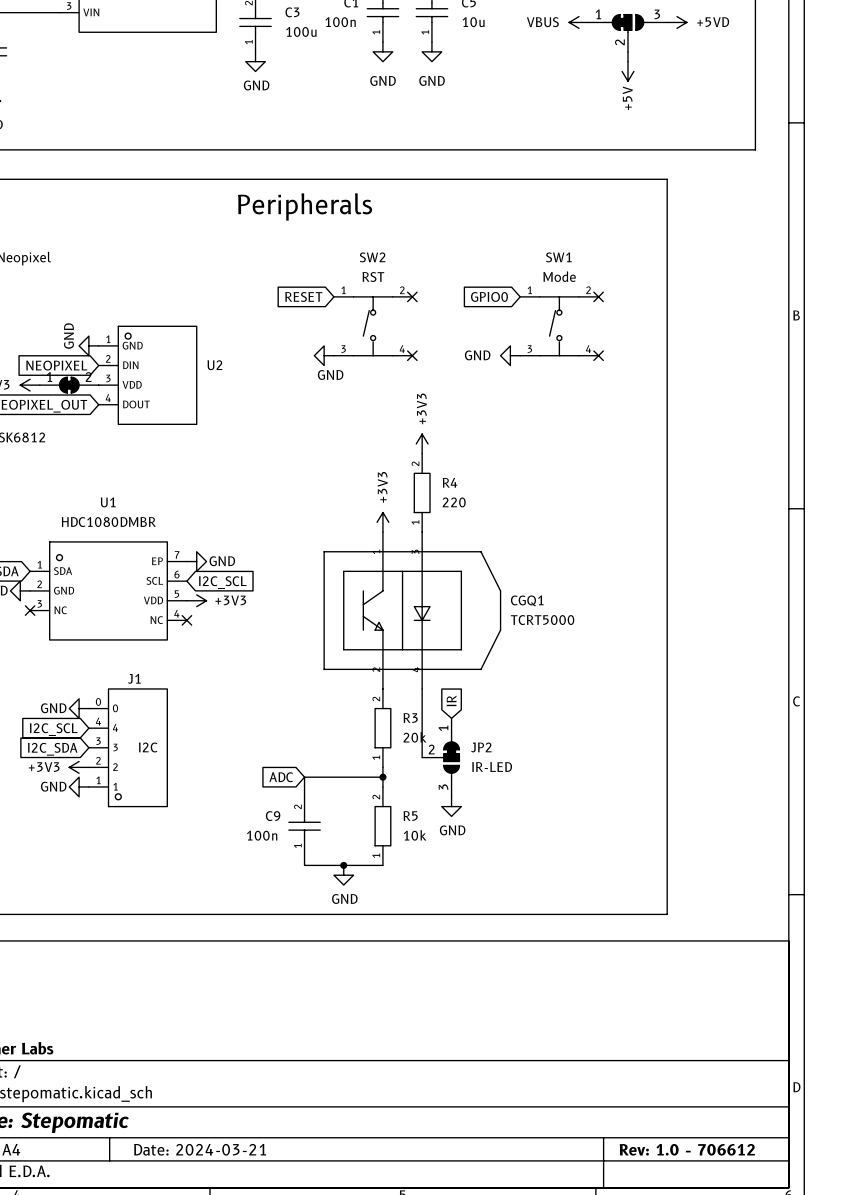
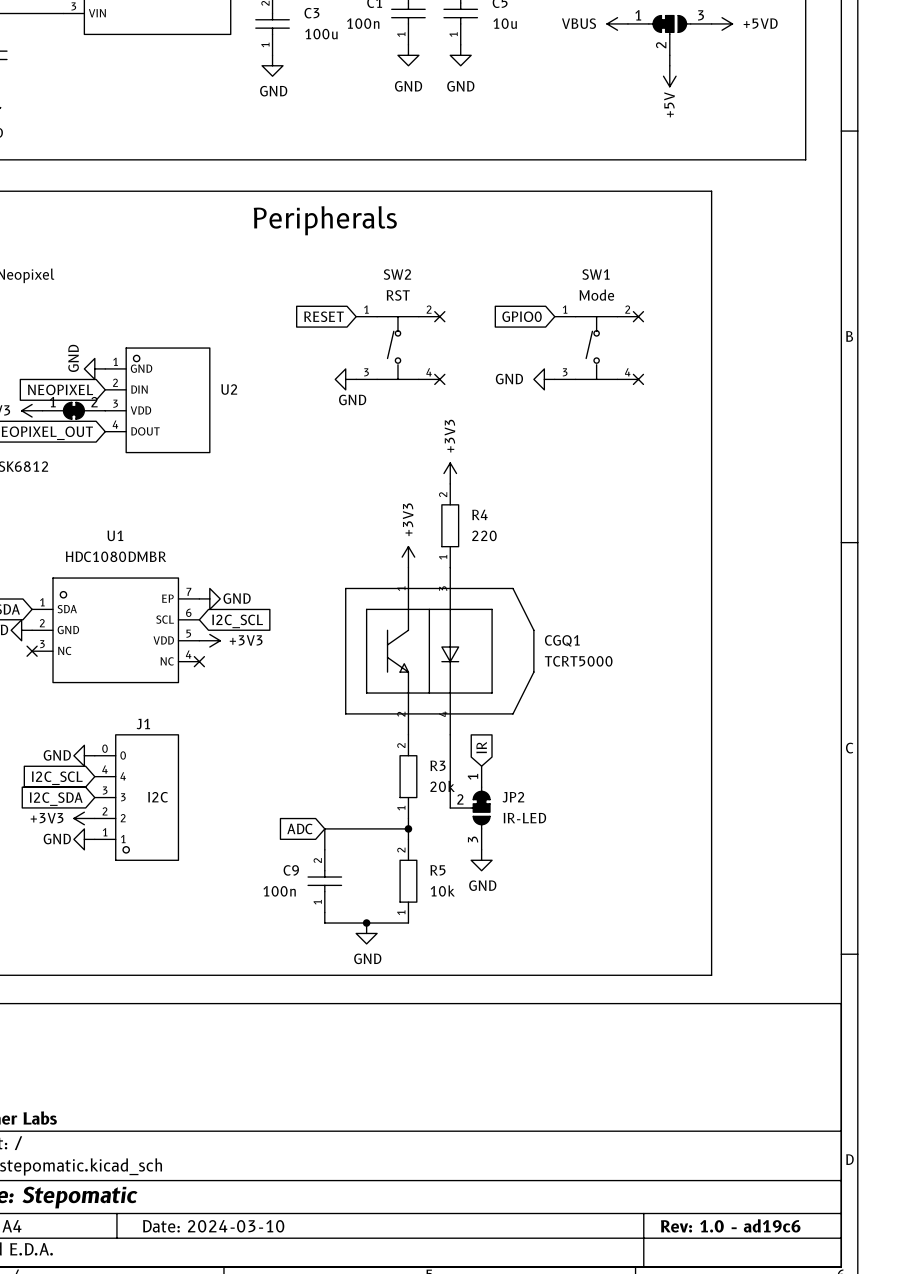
title block: Date: 2024-03-21 (200, 1149) -> Date: 2024-03-10 (213, 1226)
title block: Rev: 1.0 - 706612 (687, 1149) -> Rev: 1.0 - ad19c6 (730, 1225)

